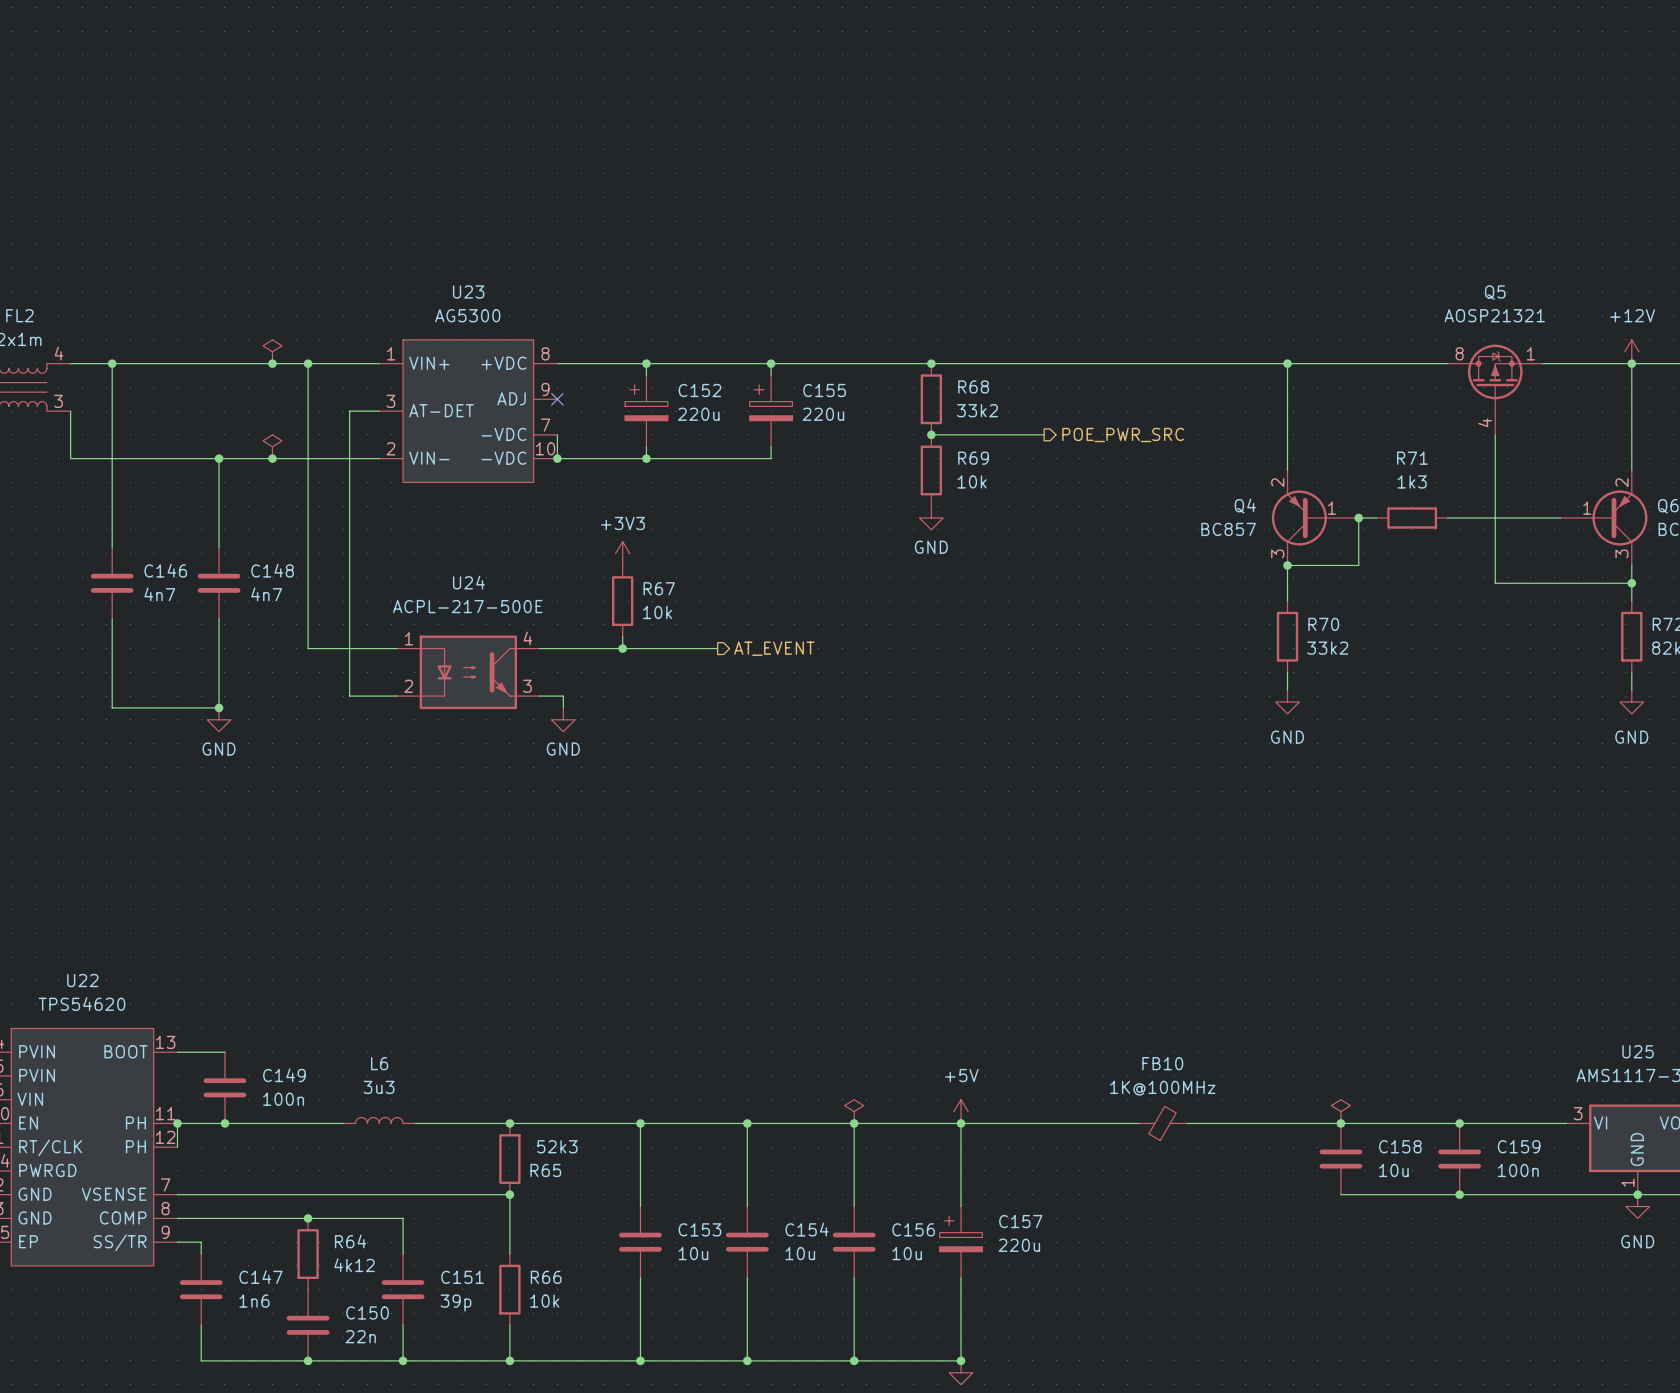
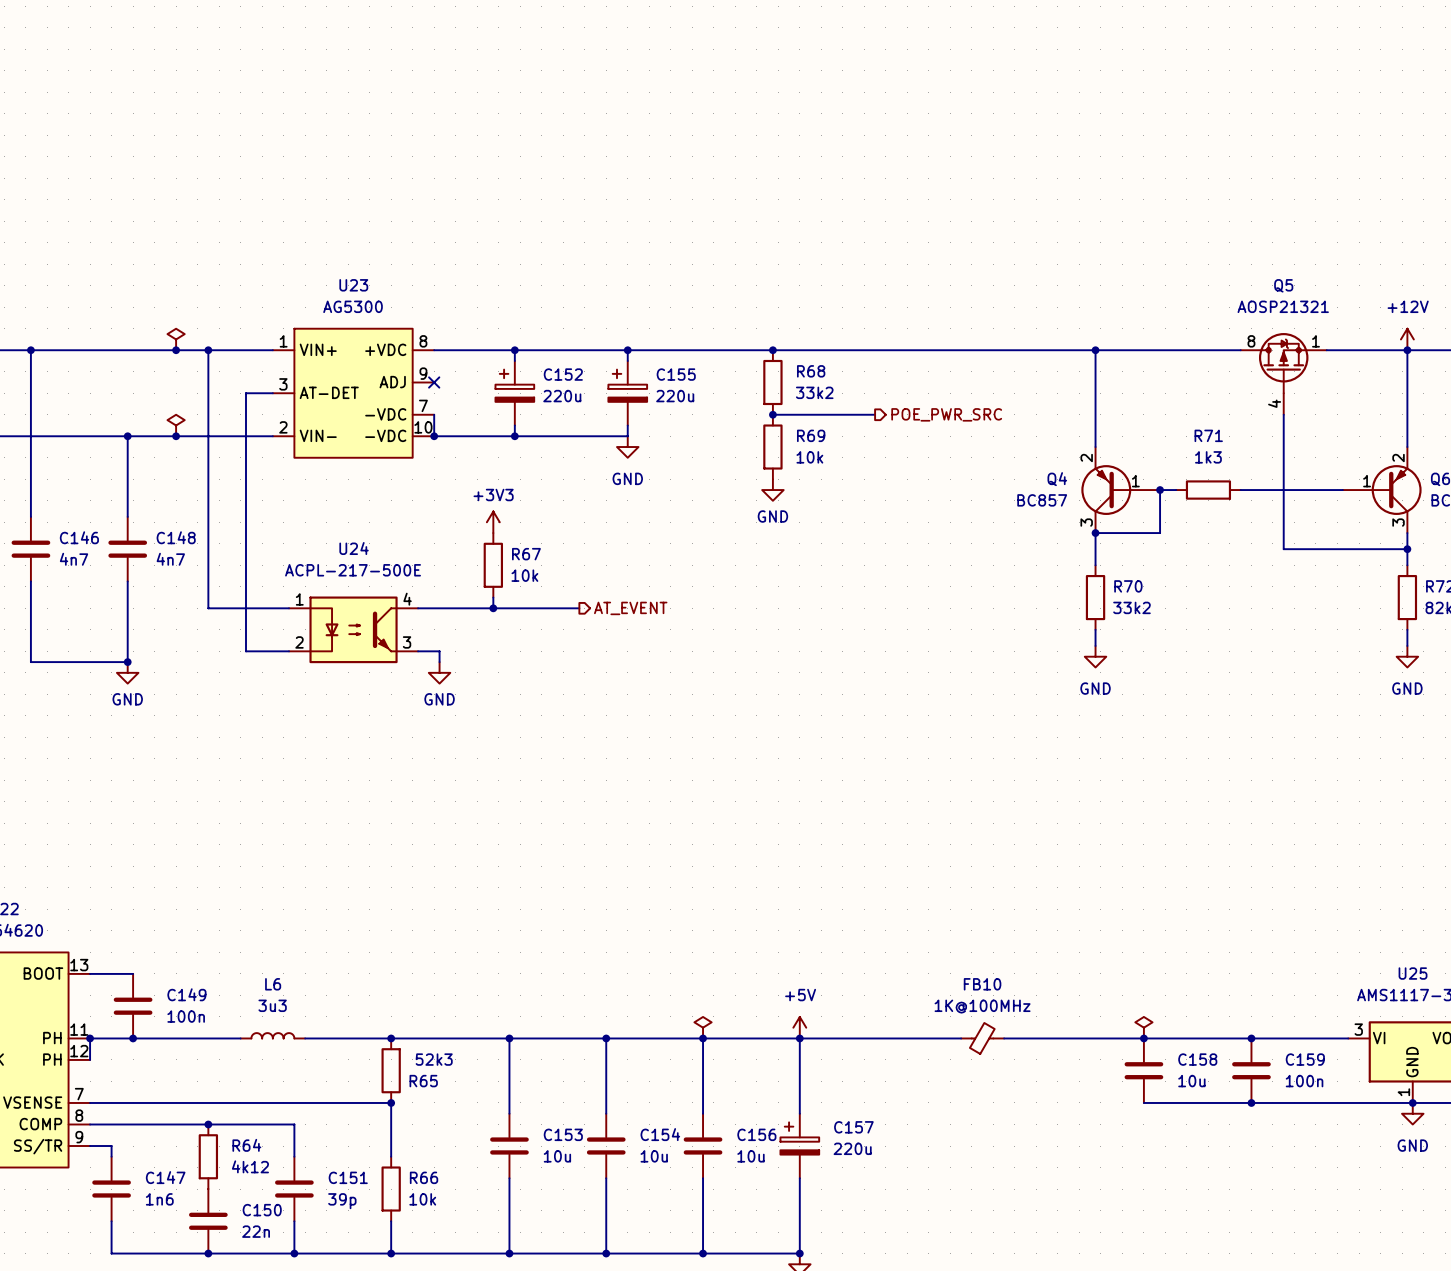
power symbol: none -> GND (627, 447)

